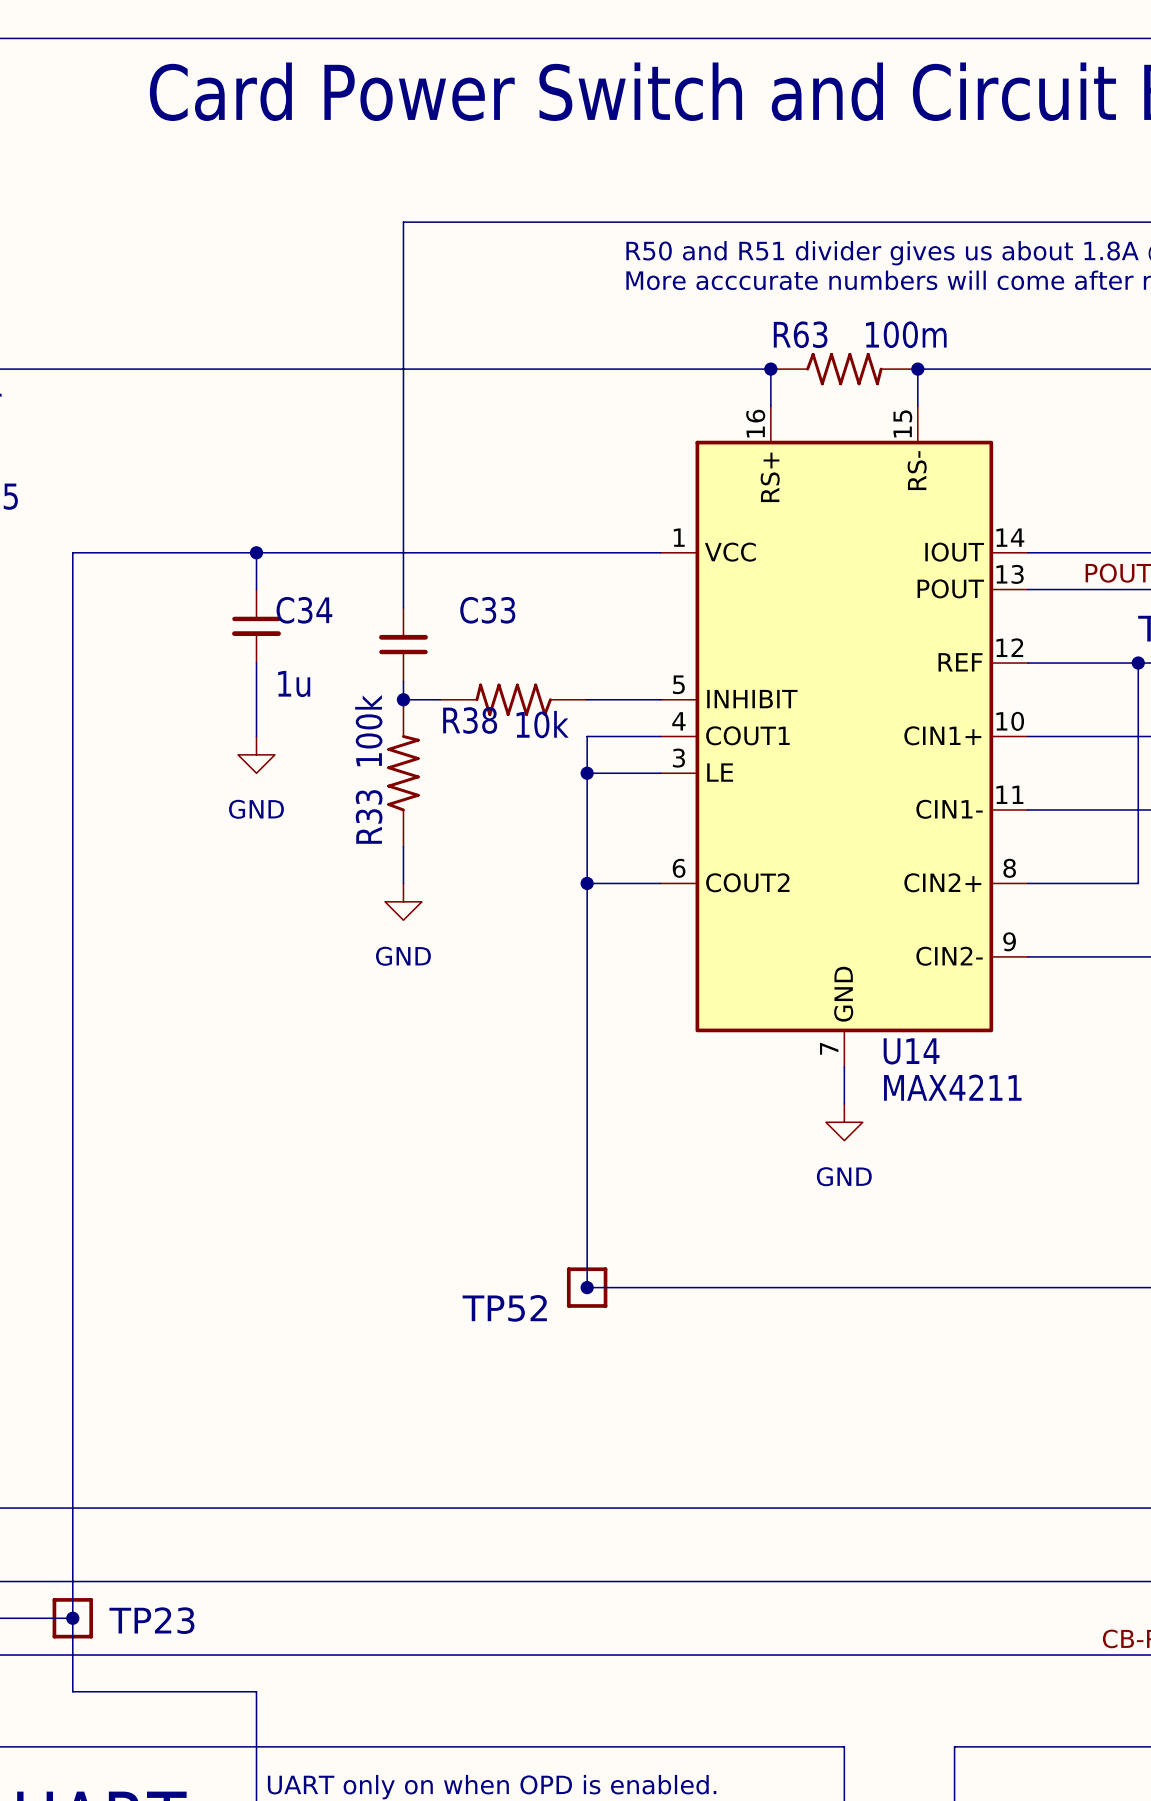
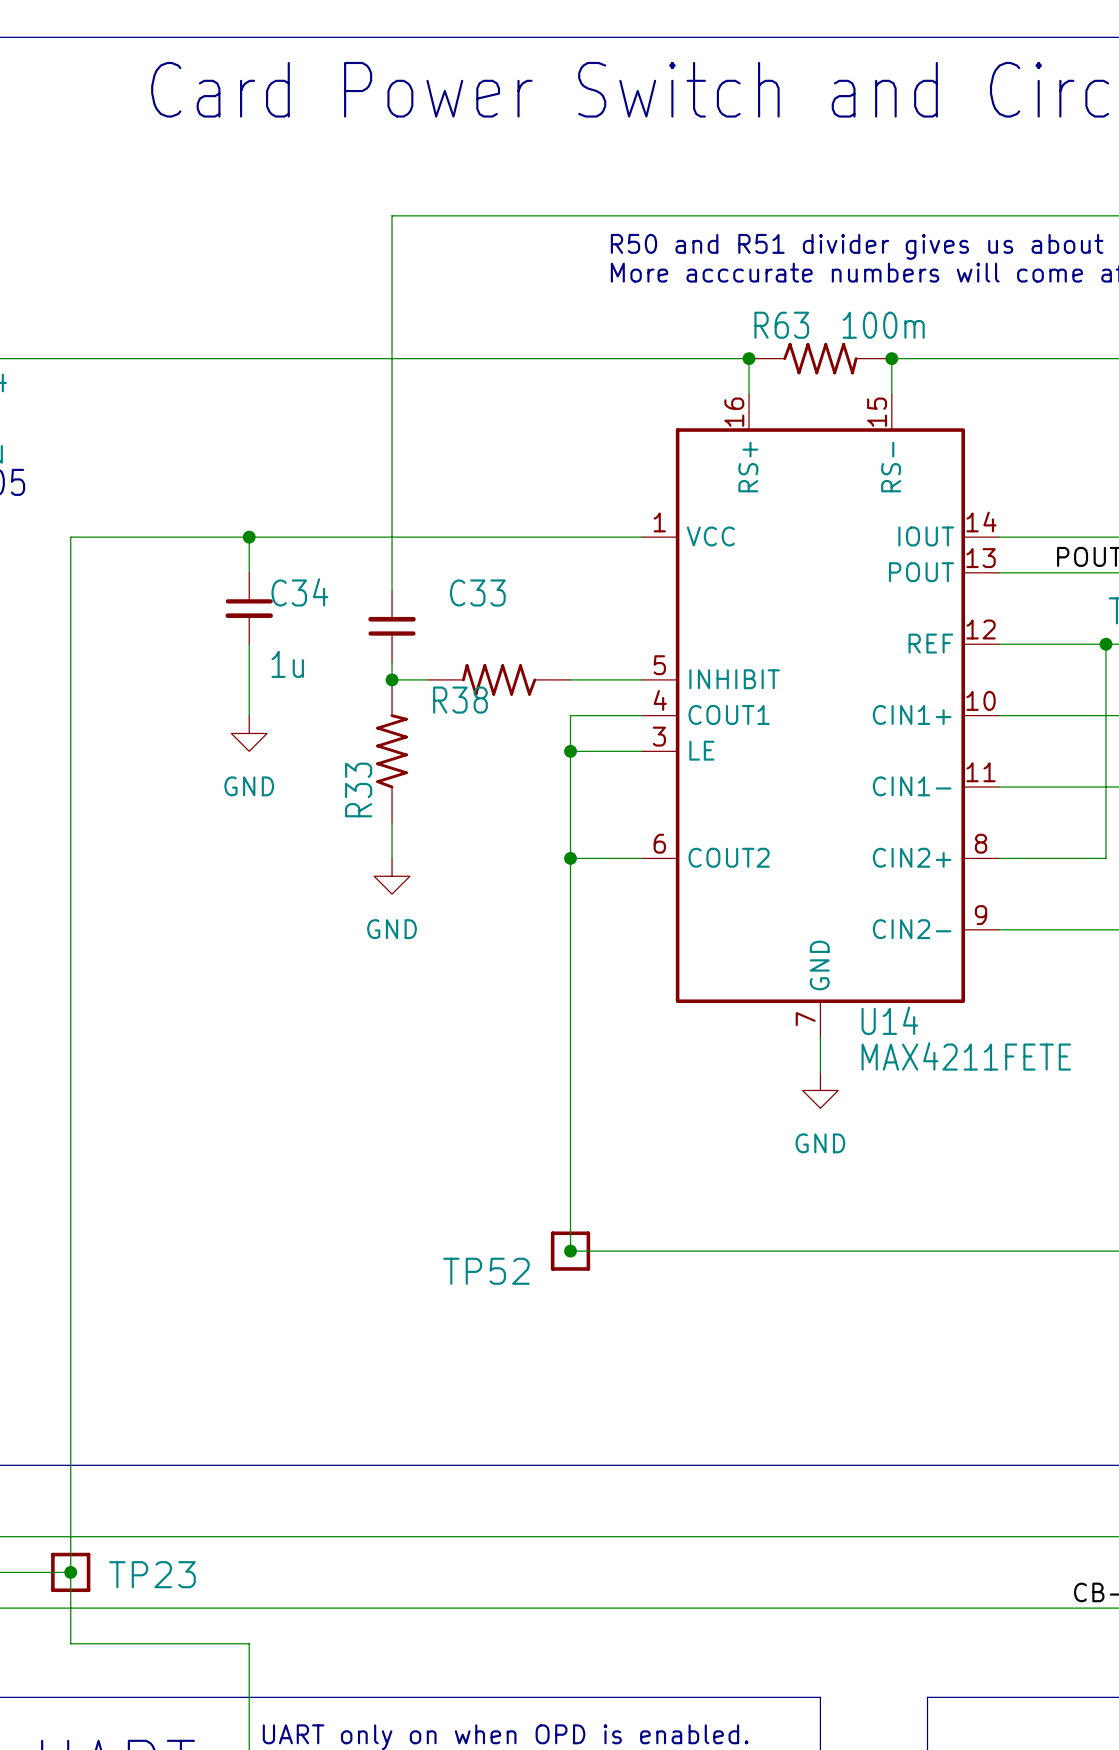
U14 symbol: [660, 405, 1029, 1068] -> [641, 394, 999, 1037]
R38 value: 10k (542, 724) -> none
R33 value: 100k (368, 730) -> none
U14 value: MAX4211 (952, 1087) -> MAX4211FETE (966, 1056)

